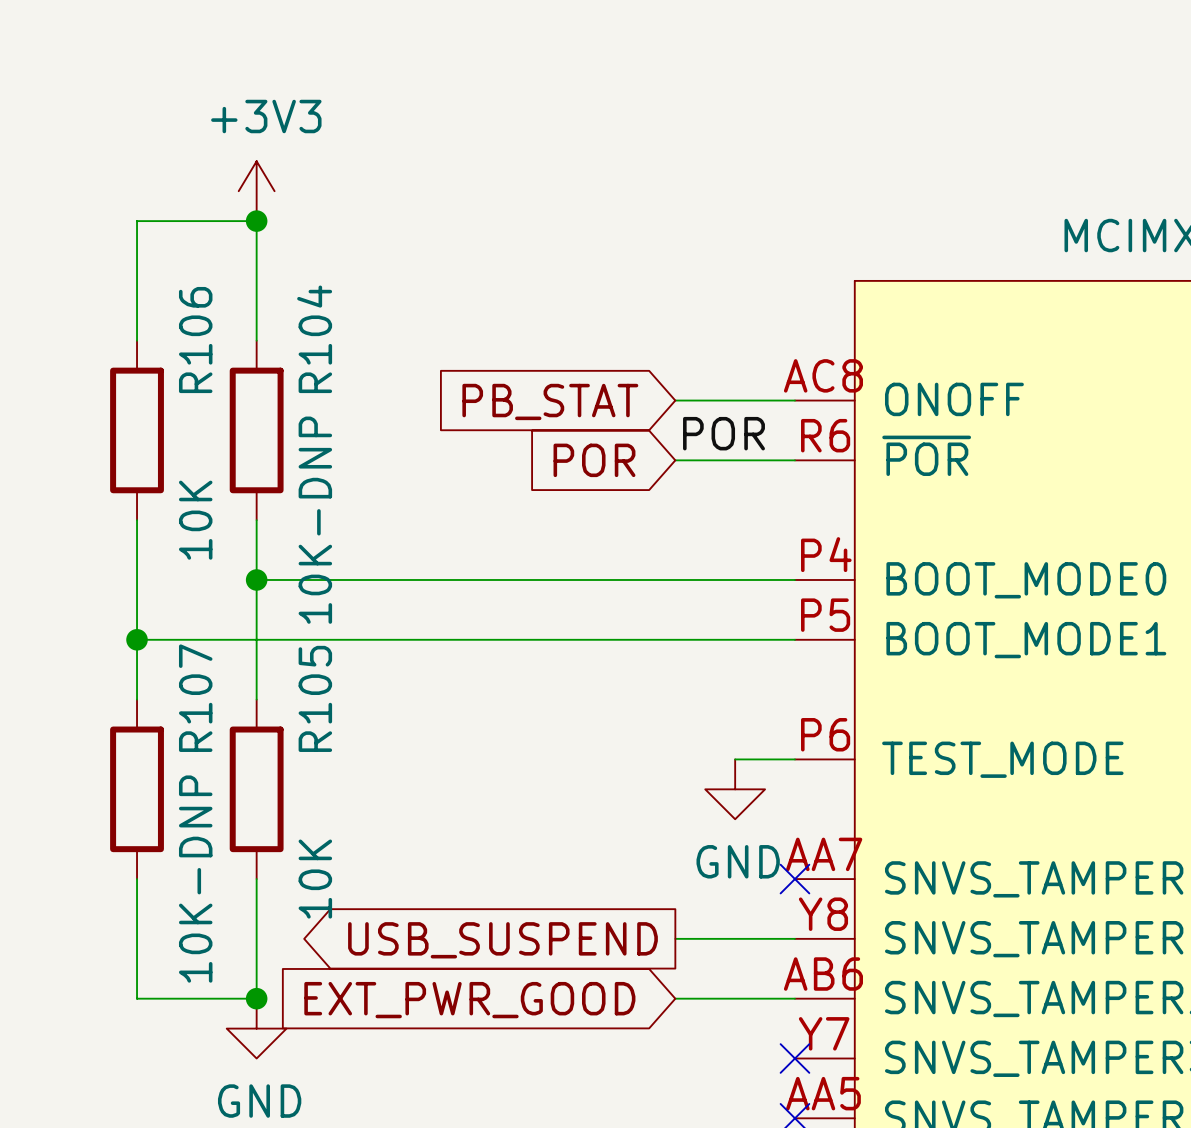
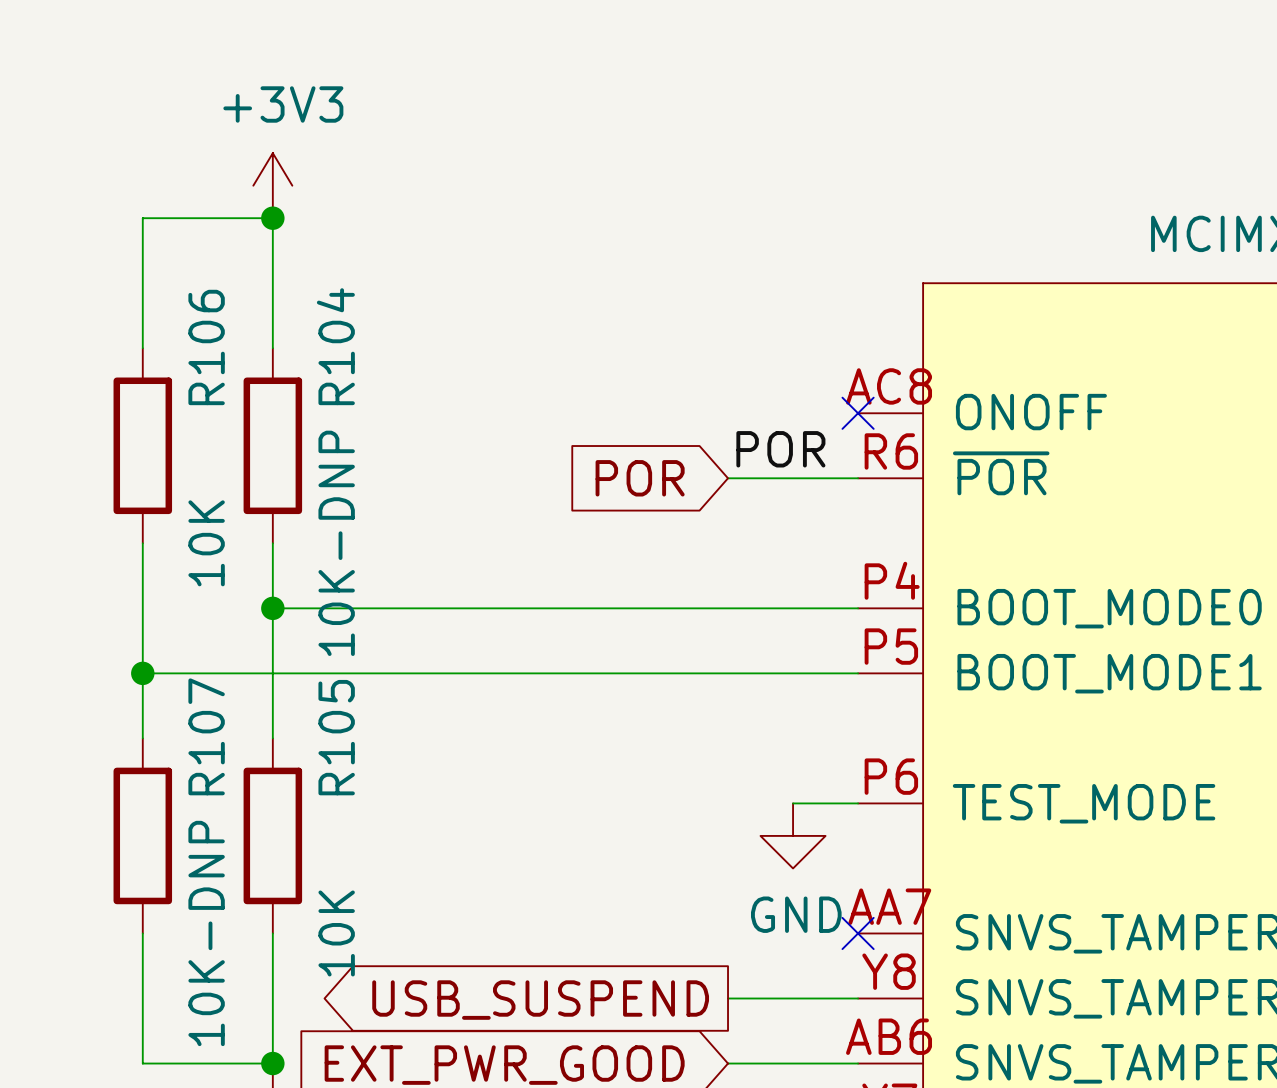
wire: (675, 400) (794, 400) -> none
no-connect mark: none -> (858, 413)
global label: PB_STAT (550, 401) -> none

